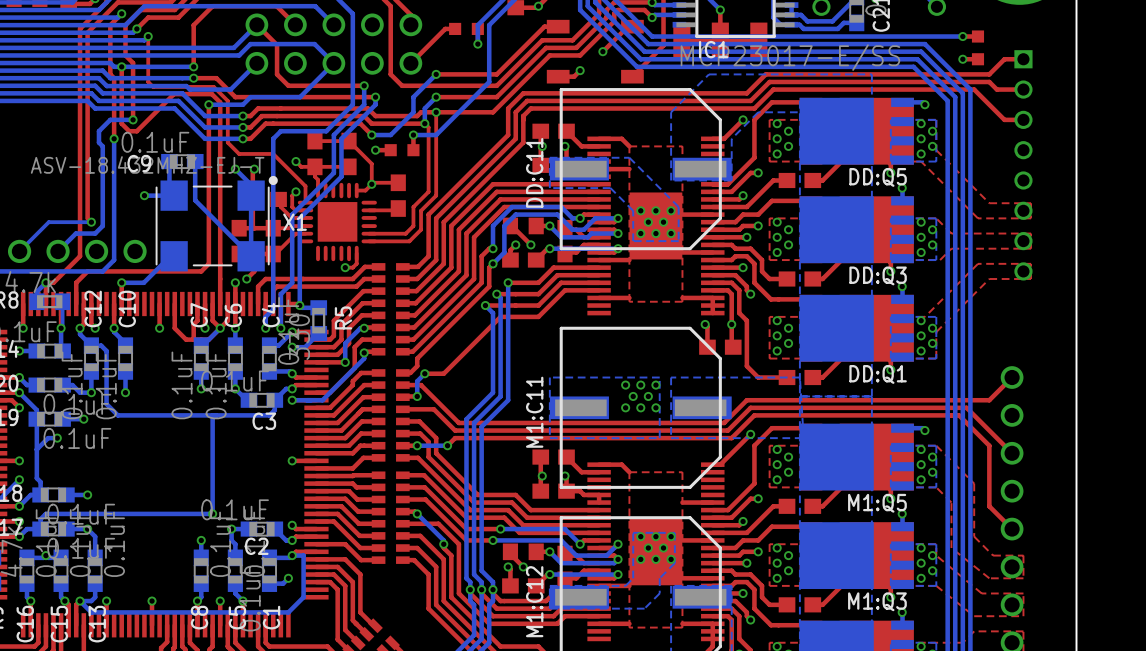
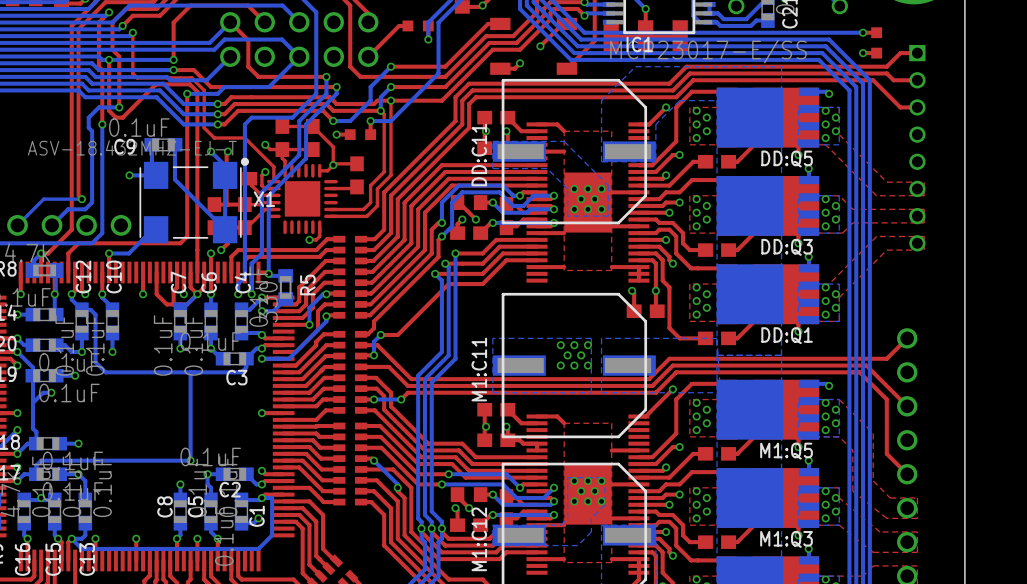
C8 name position: C8 (199, 617) -> C8 (165, 506)
C5 name position: C5 (237, 617) -> C5 (195, 506)
C1 name position: C1 (271, 617) -> C1 (256, 516)

